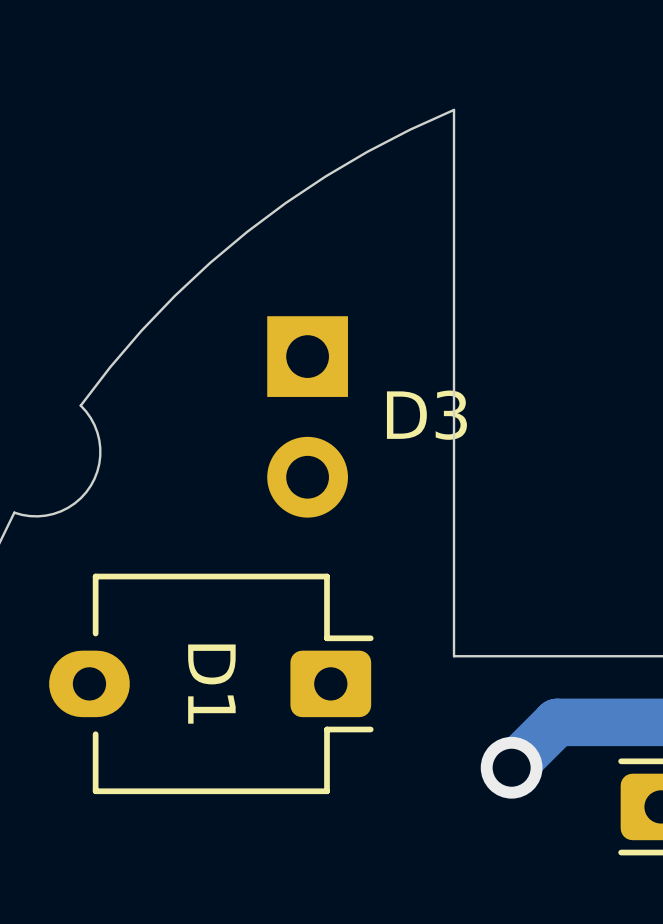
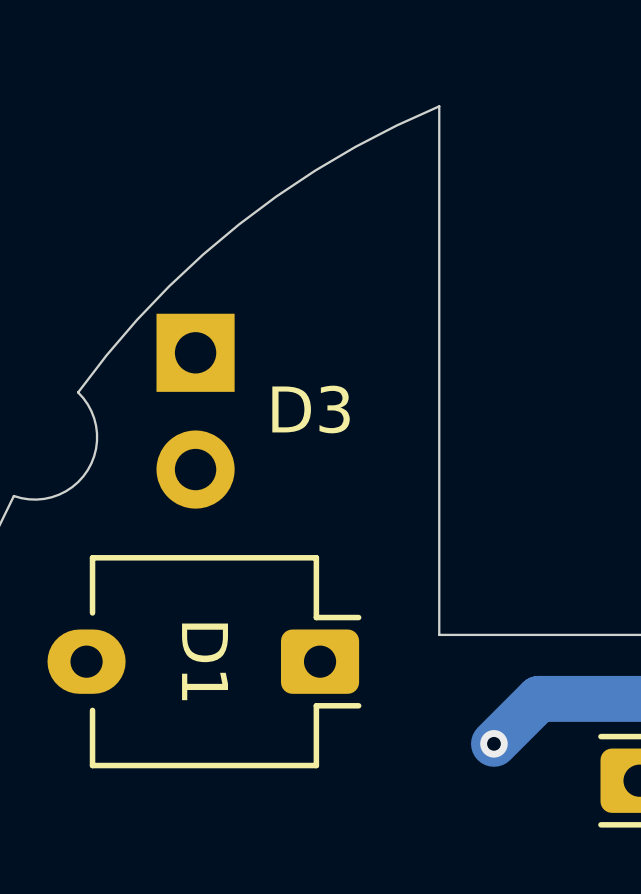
D3 position: (307, 416) -> (195, 411)
via size: [480, 736, 543, 799] -> [480, 730, 508, 758]

